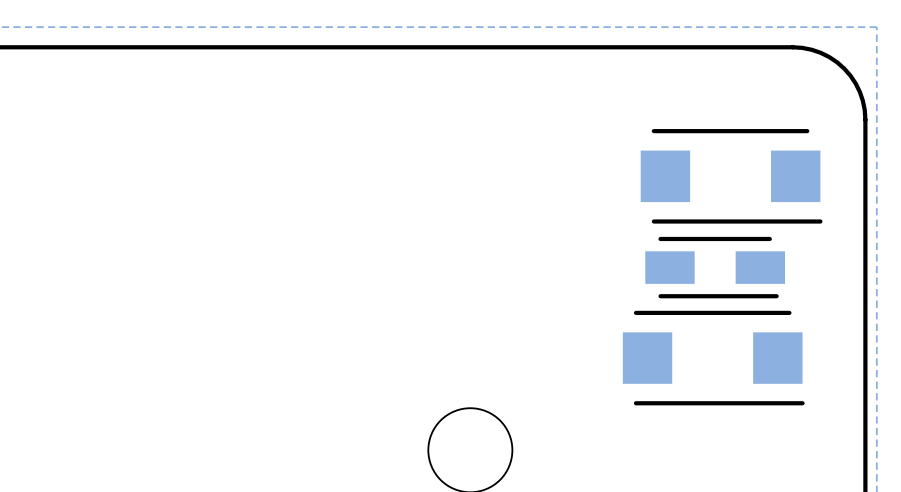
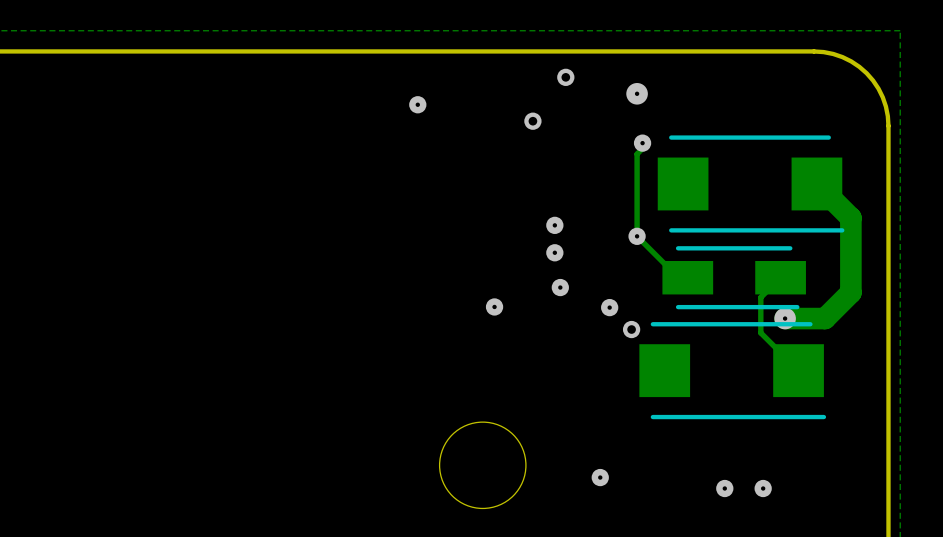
via: none -> (565, 77)
via: none -> (637, 93)
via: none -> (417, 104)
via: none -> (532, 121)
track: none -> (642, 143) (642, 148) (637, 154) (637, 236) (678, 277)
via: none -> (642, 143)
track: none -> (816, 183) (850, 217) (850, 292) (825, 318) (785, 318)
via: none -> (554, 225)
via: none -> (637, 236)
via: none -> (554, 252)
track: none -> (780, 277) (760, 297) (760, 332) (798, 370)
via: none -> (560, 287)
via: none -> (494, 306)
via: none -> (609, 307)
via: none -> (785, 318)
via: none -> (631, 329)
via: none -> (600, 477)
via: none -> (724, 488)
via: none -> (763, 488)

